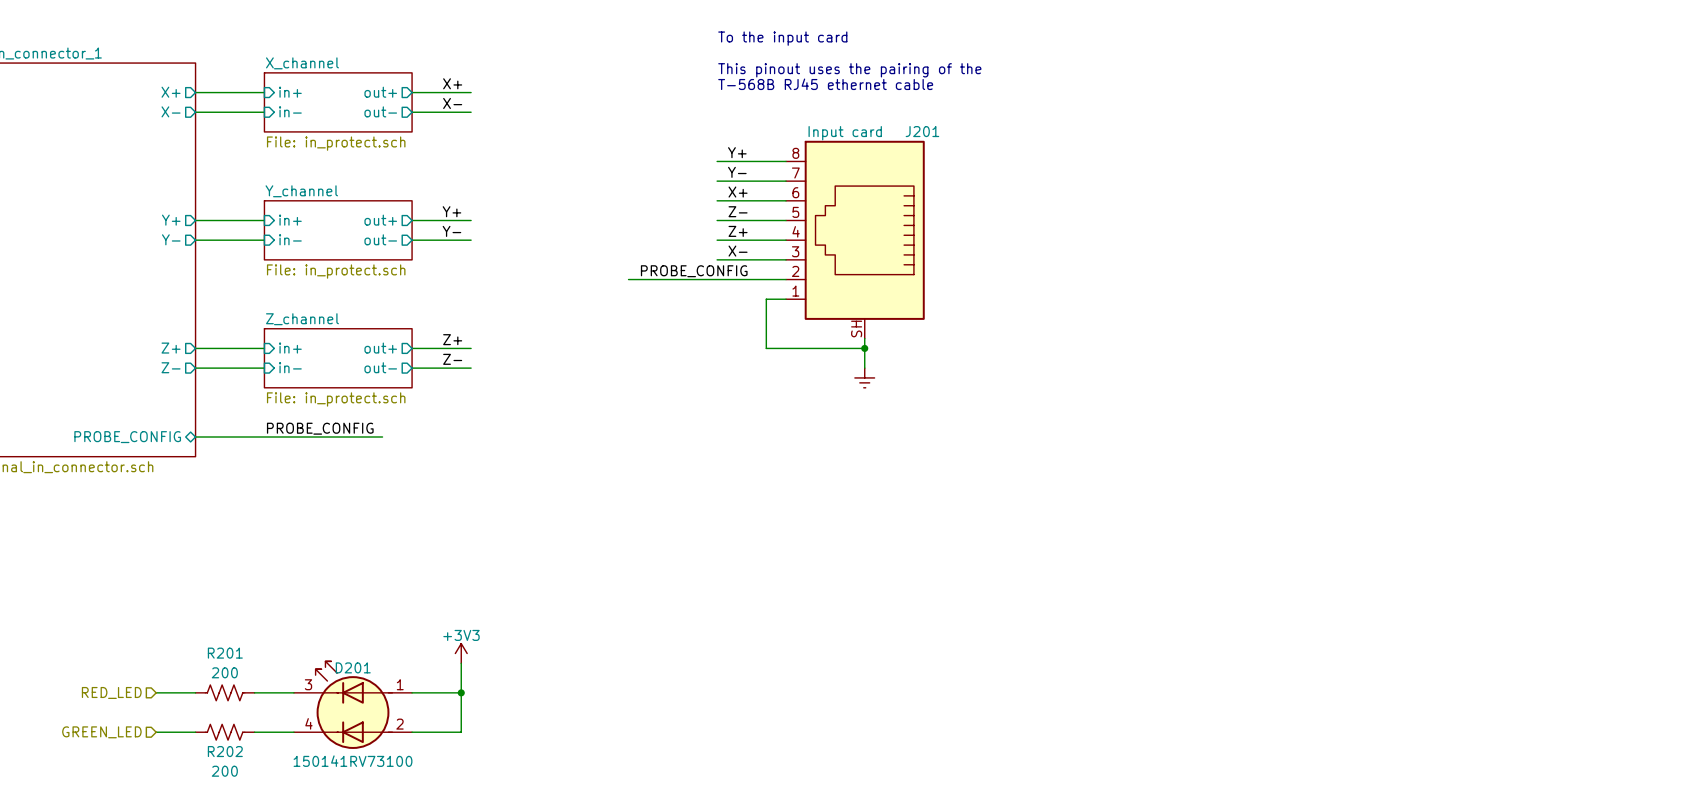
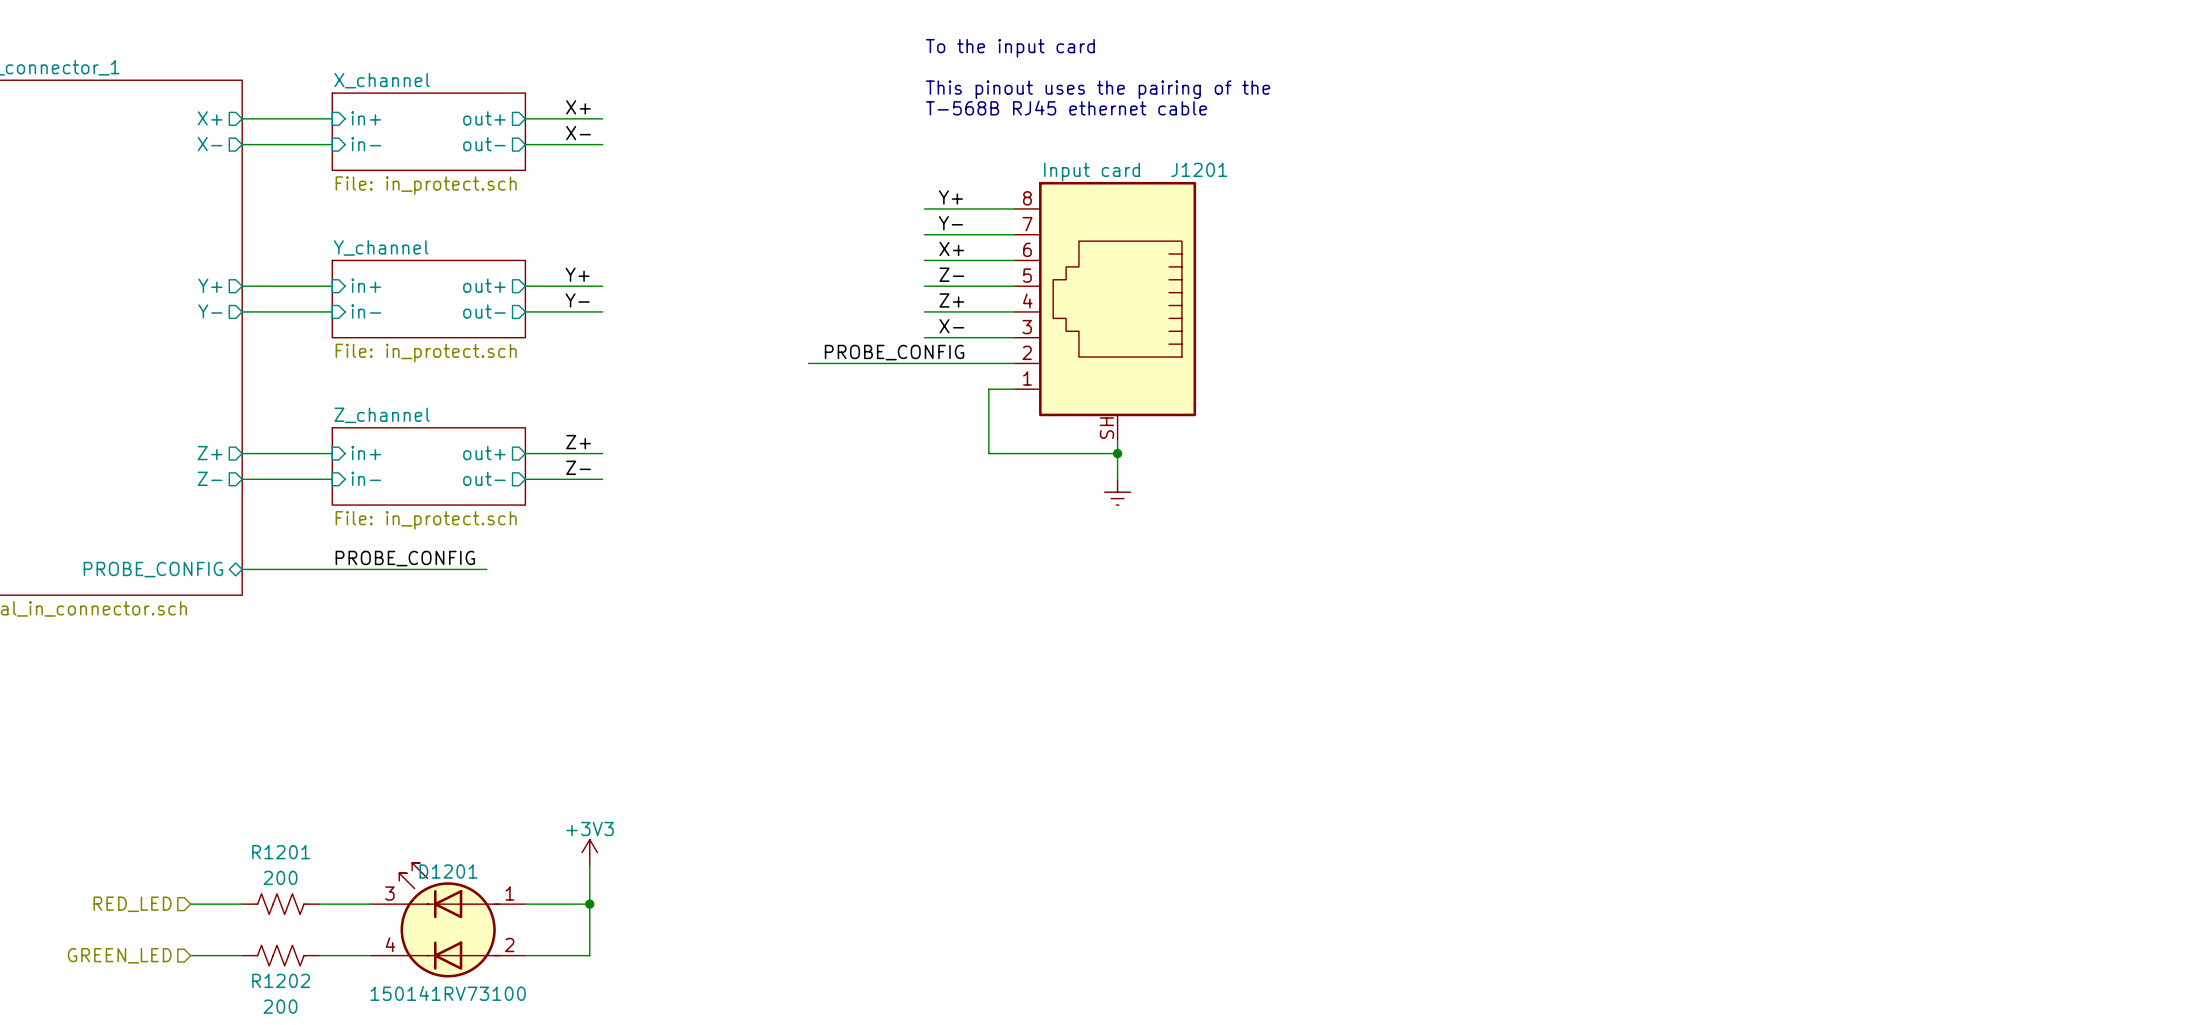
J201 name: J201 (922, 131) -> J1201 (1199, 169)
R201 name: R201 (225, 653) -> R1201 (281, 852)
D201 name: D201 (353, 667) -> D1201 (448, 871)
R202 name: R202 (225, 751) -> R1202 (281, 980)

